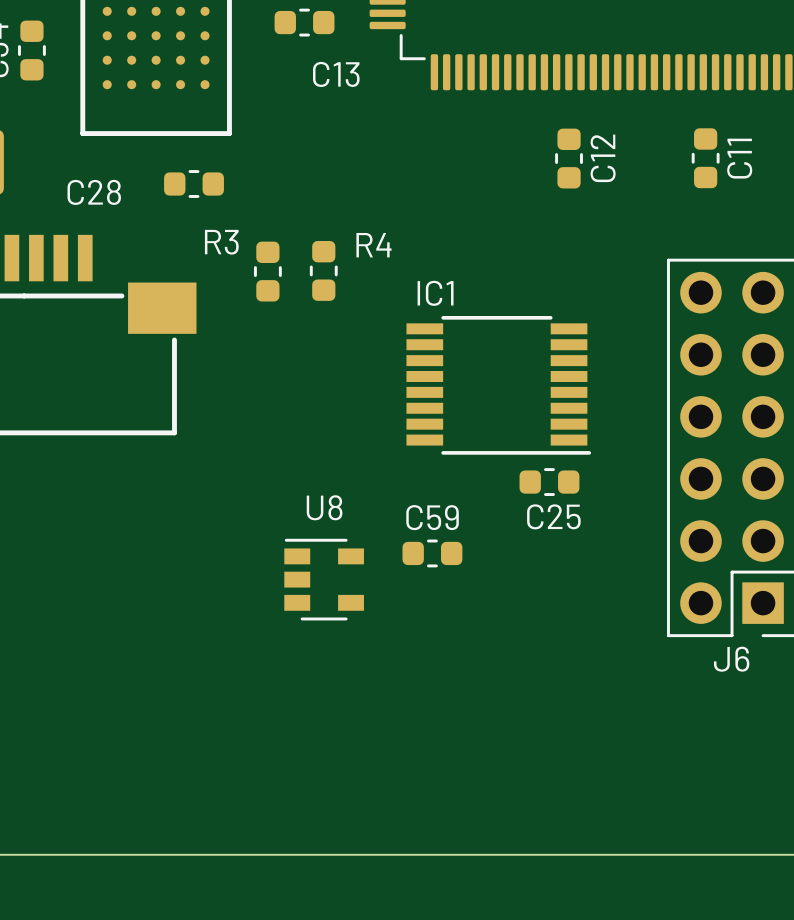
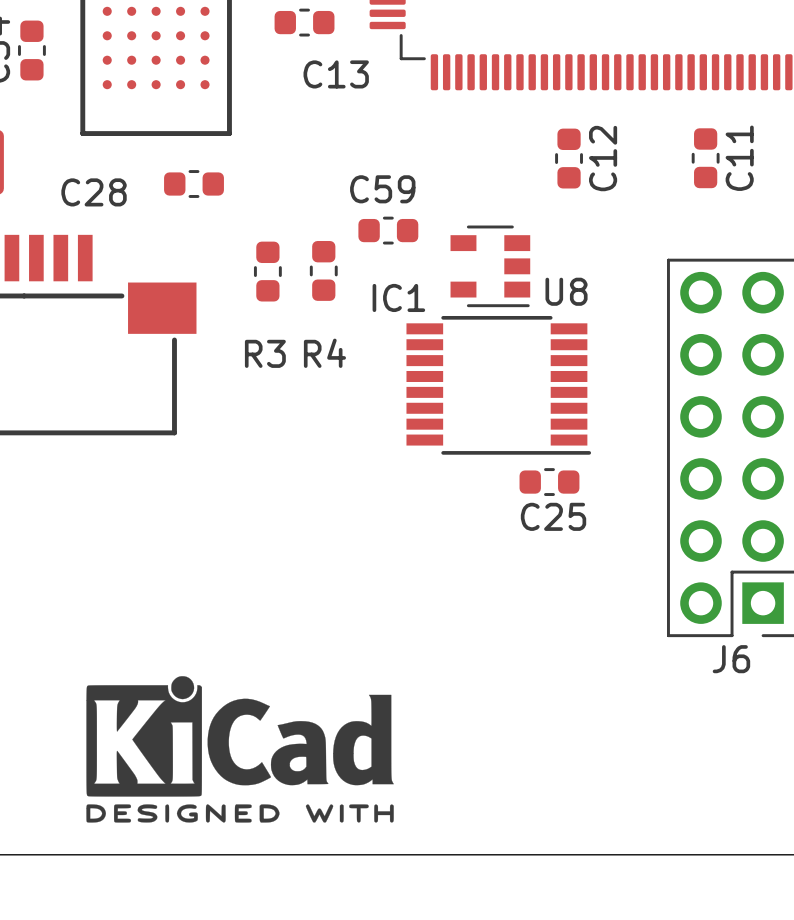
R3 name position: R3 (221, 242) -> R3 (265, 353)
R4 name position: R4 (374, 245) -> R4 (324, 353)
IC1 name position: IC1 (435, 293) -> IC1 (398, 297)
U8 name position: U8 (324, 507) -> U8 (566, 291)
C59 name position: C59 (432, 517) -> C59 (382, 189)
C59 position: (432, 553) -> (388, 230)
U8 rotation: 0° (324, 579) -> 180° (490, 266)
U8 position: (324, 579) -> (490, 266)
drawing: none -> [86, 676, 394, 823]

